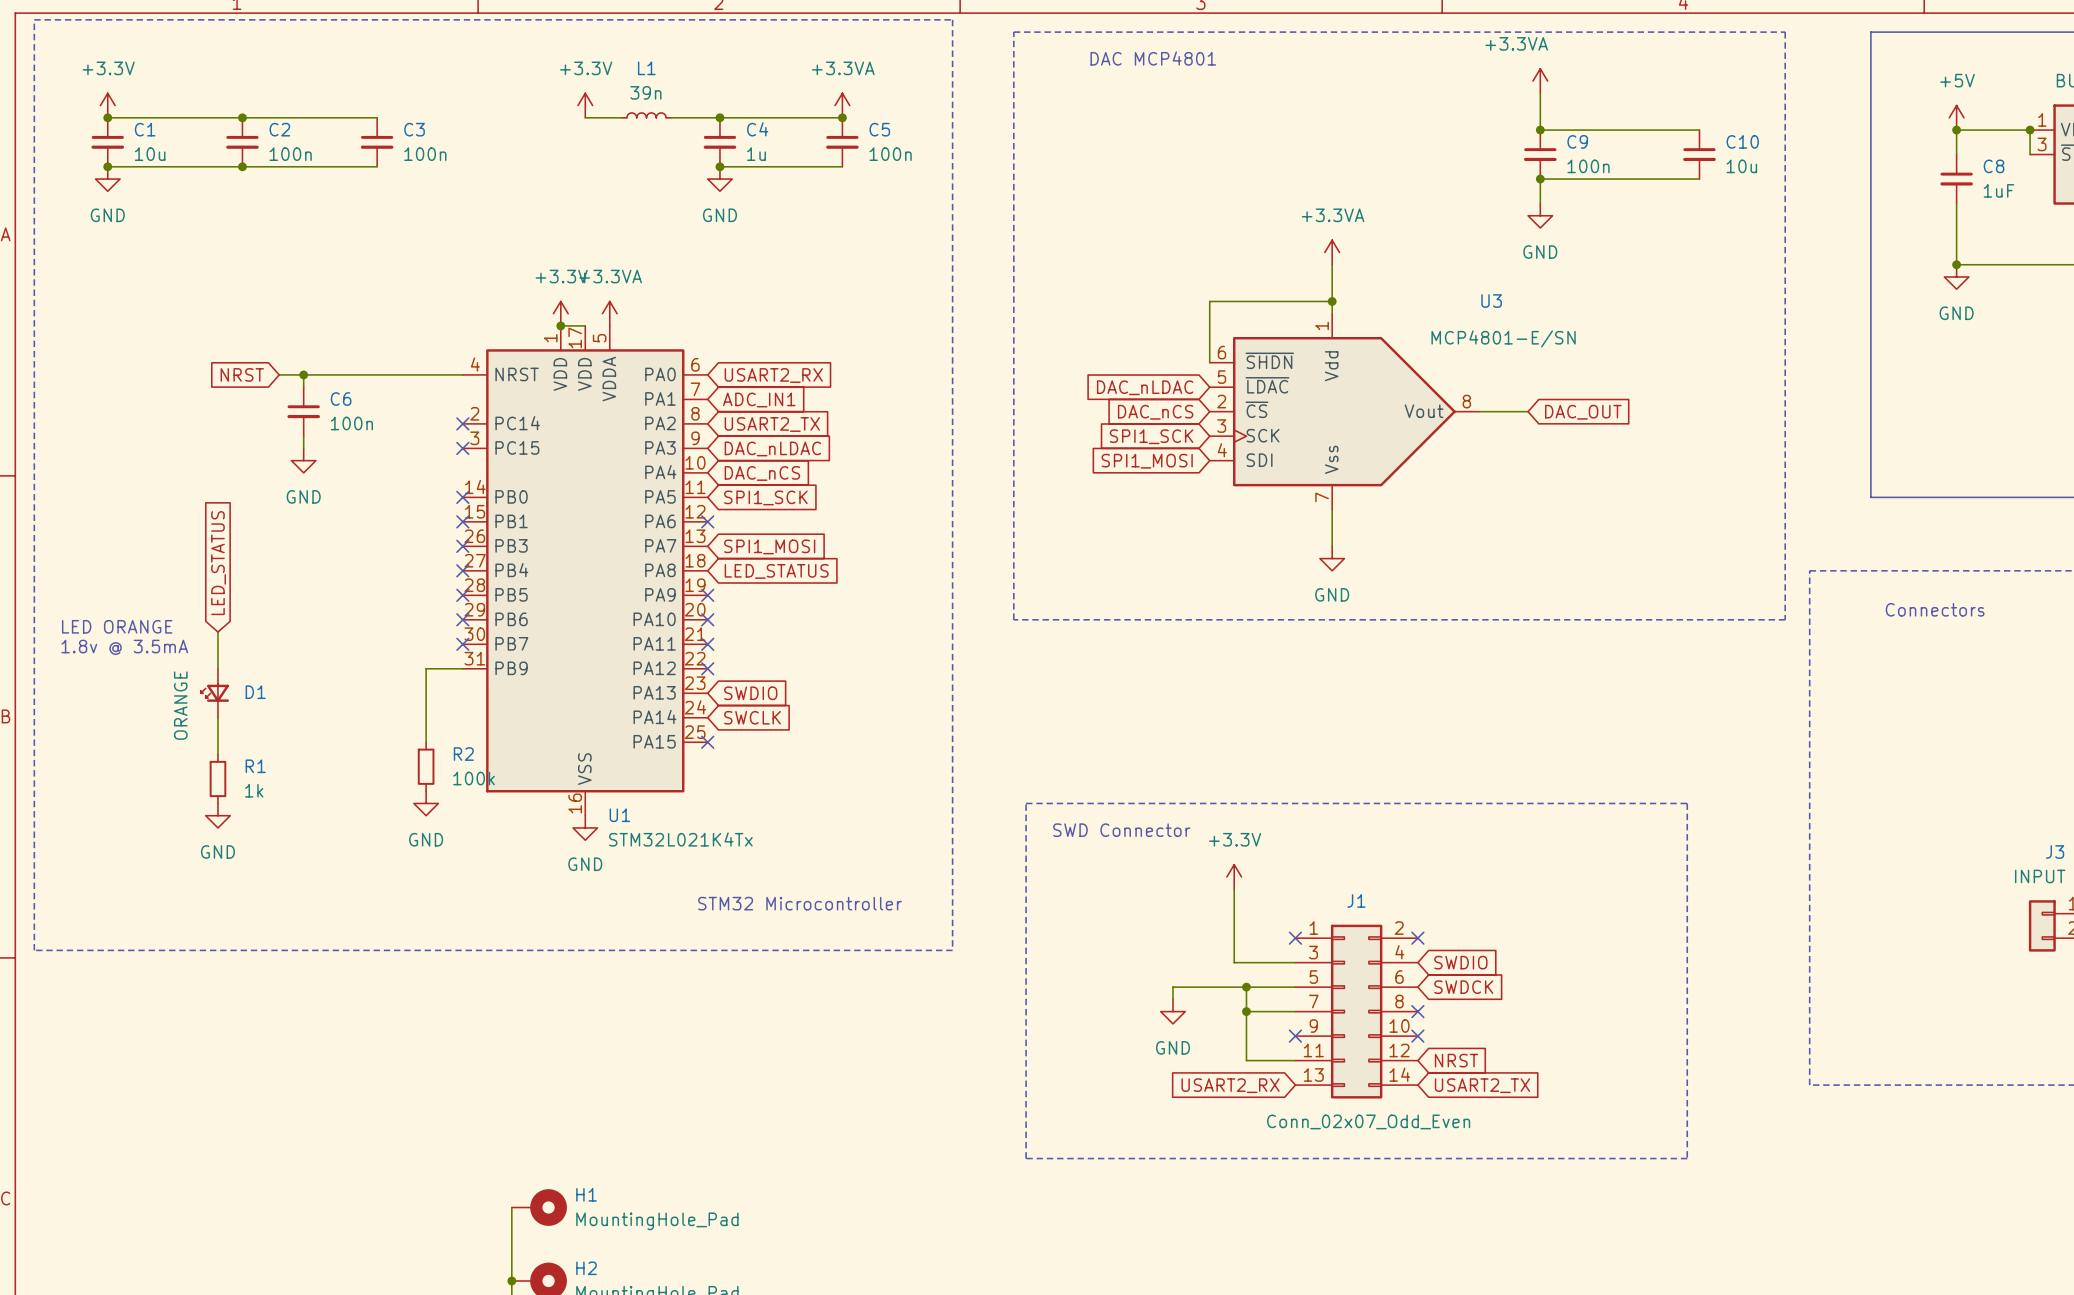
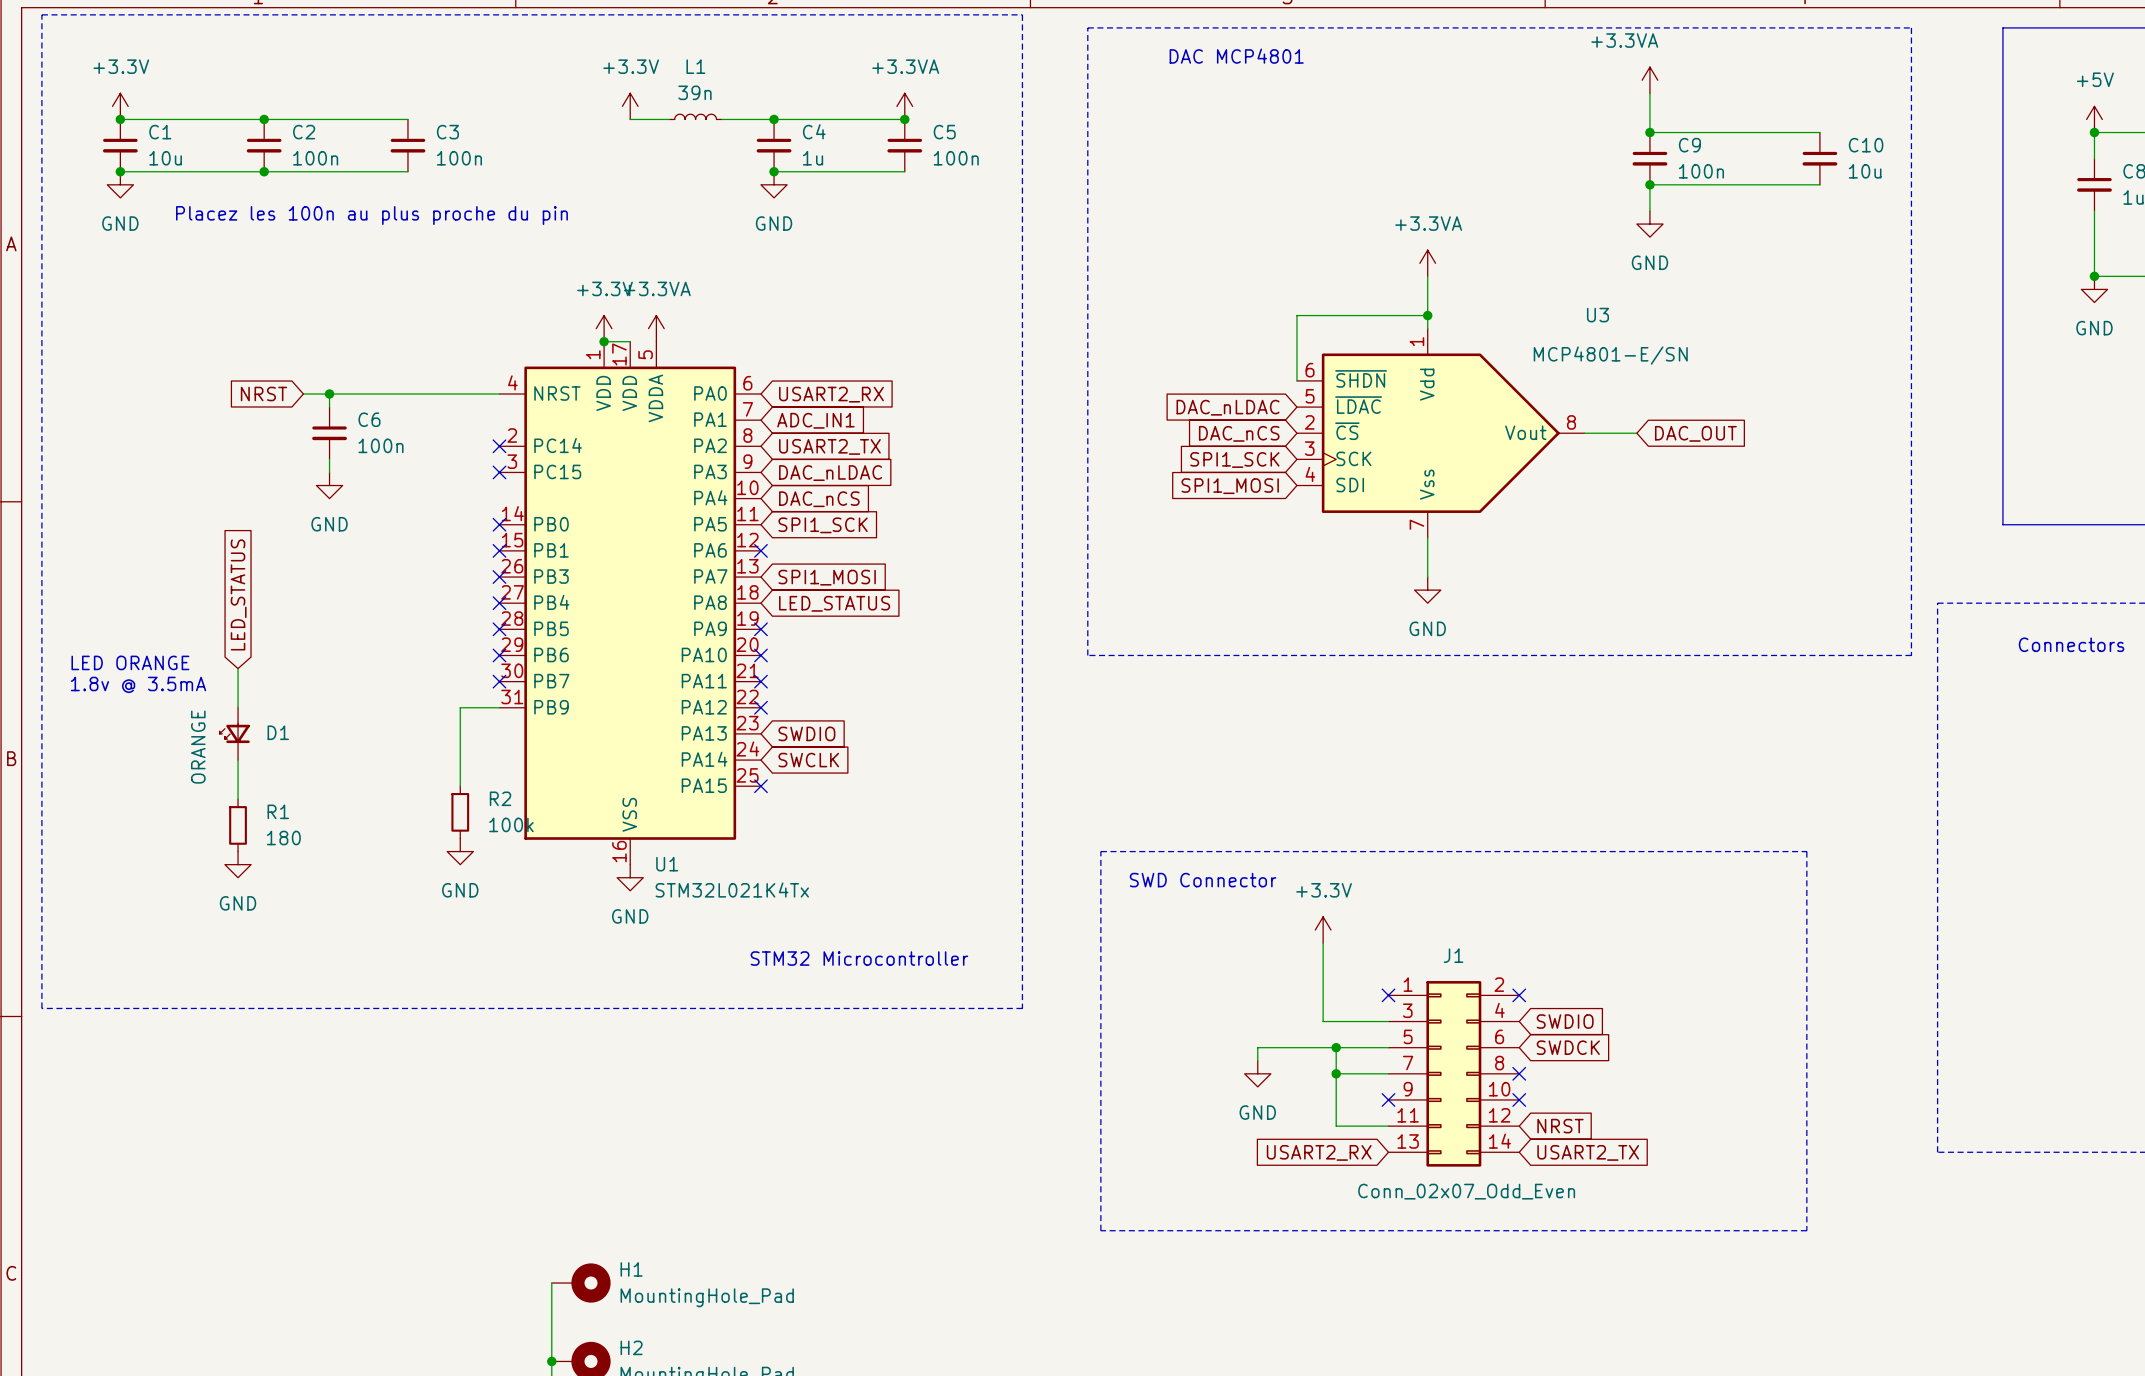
text: none -> Placez les 100n au plus proche du pin (371, 215)
R1 value: 1k (254, 790) -> 180 (283, 838)

